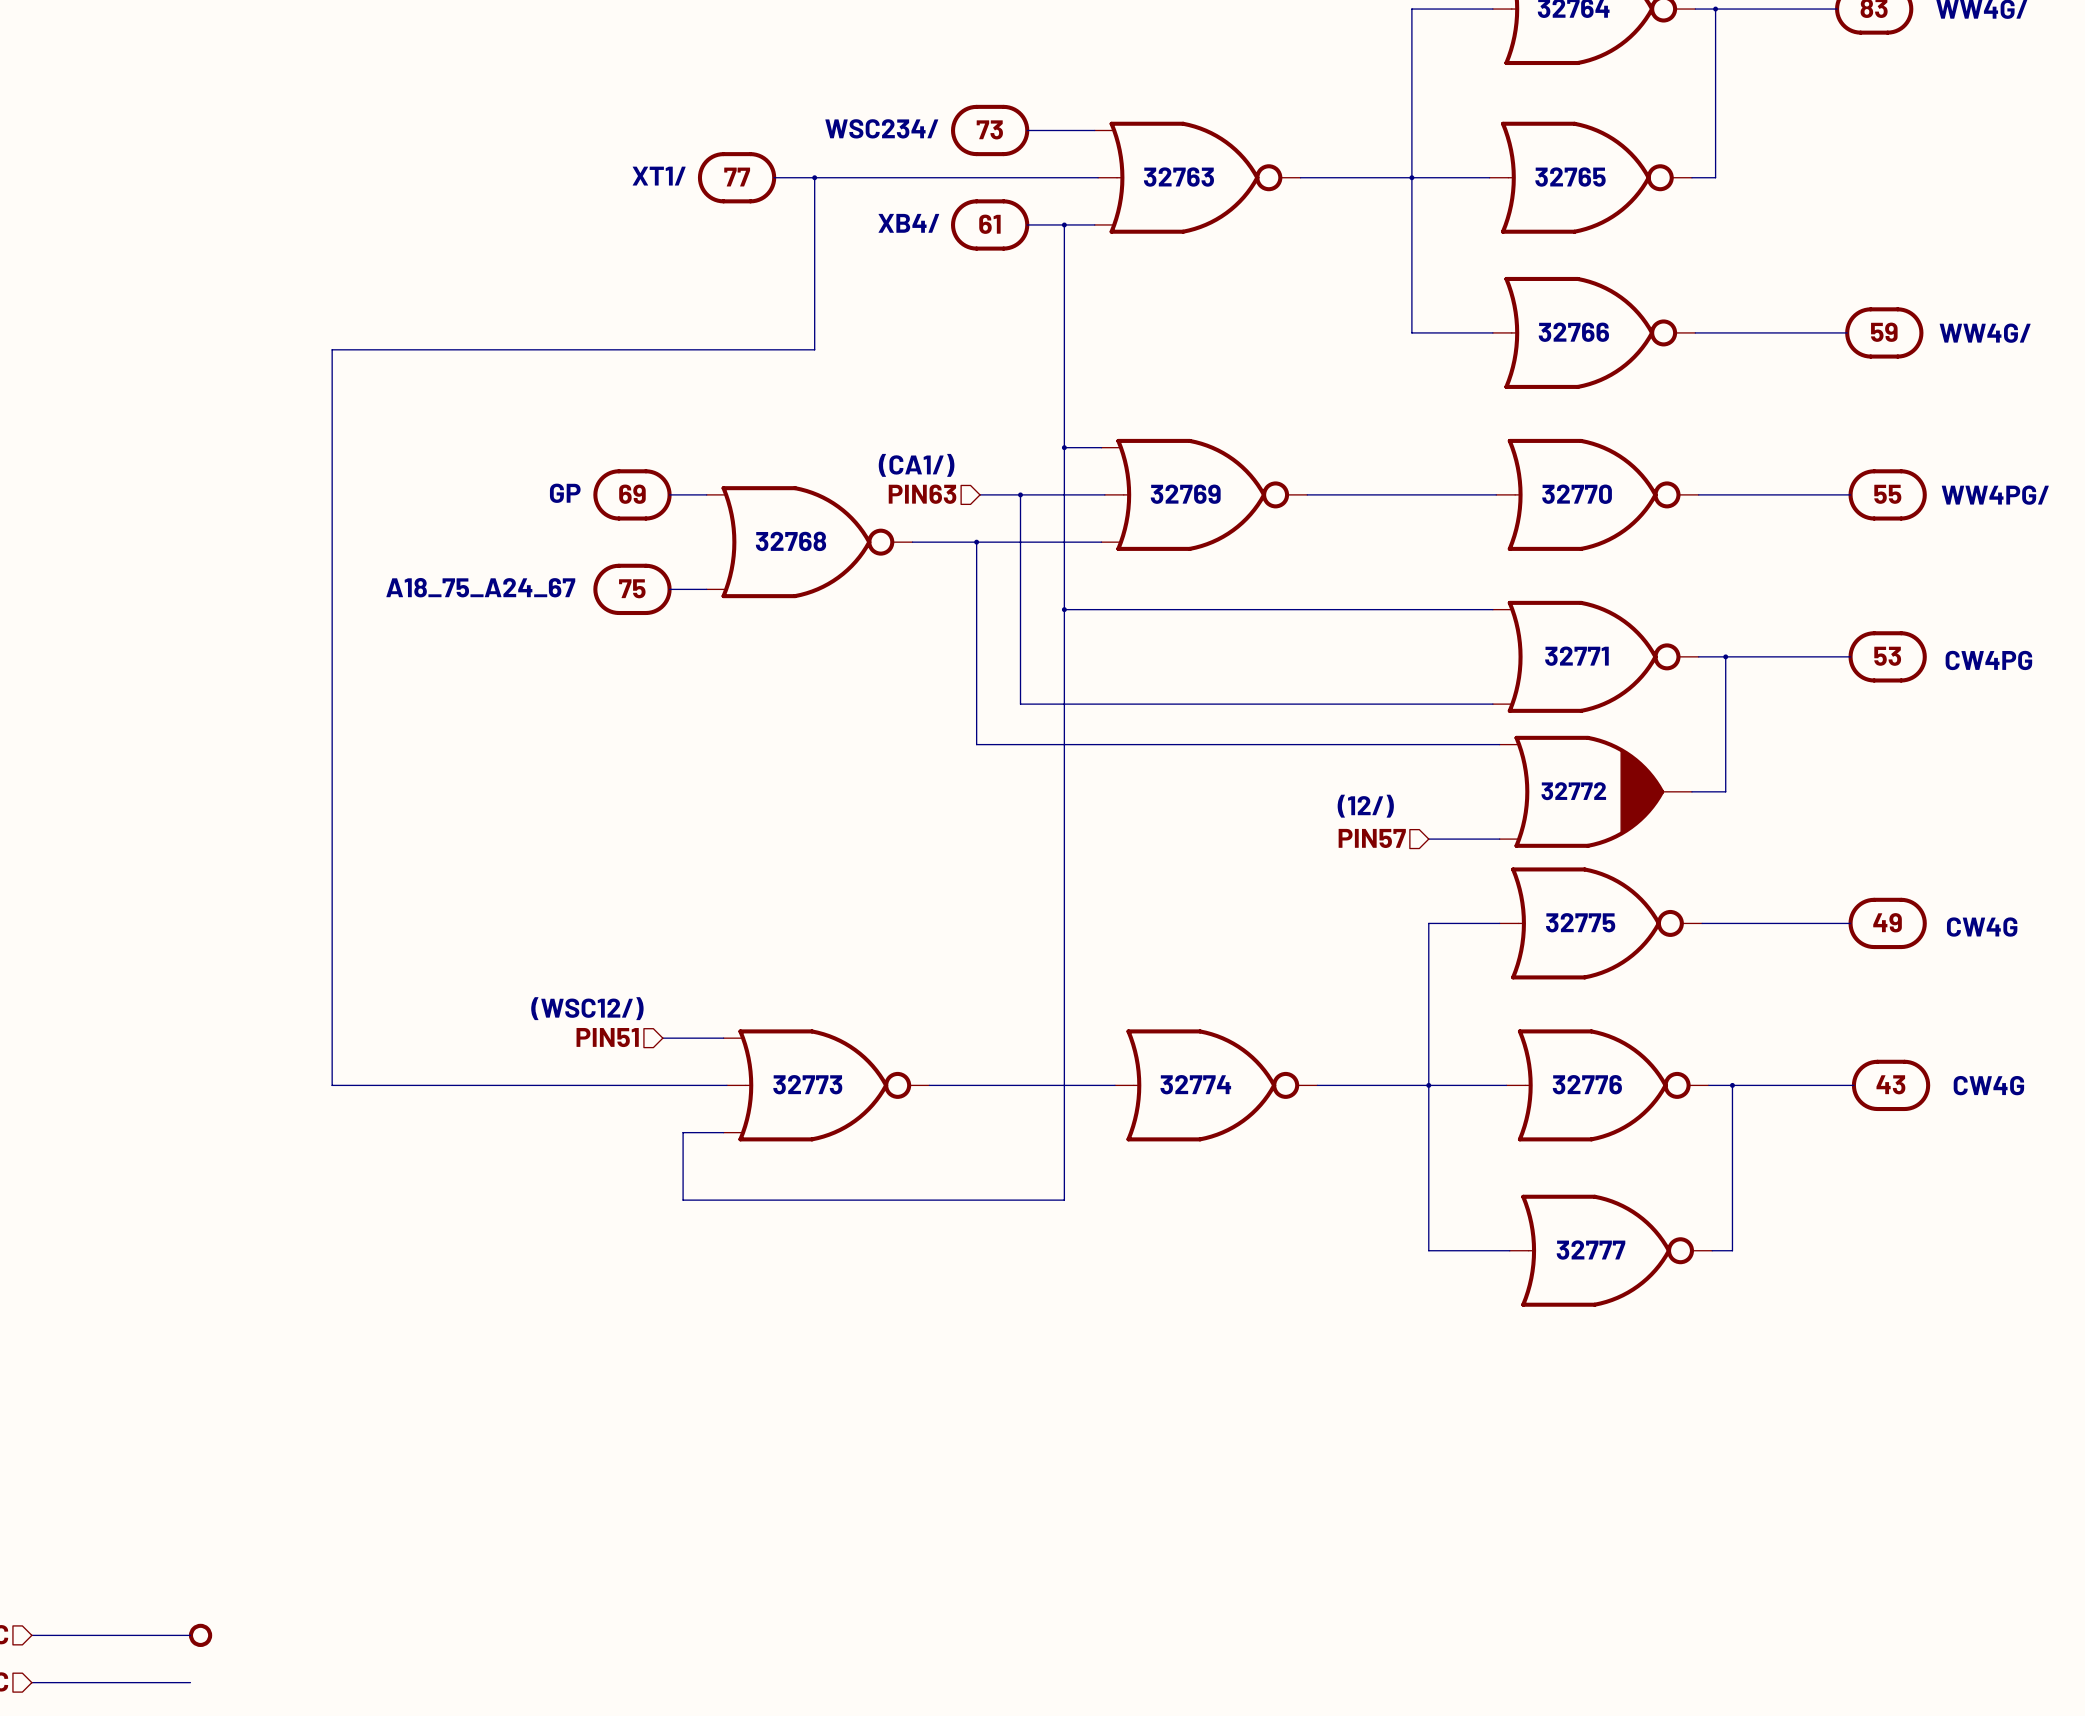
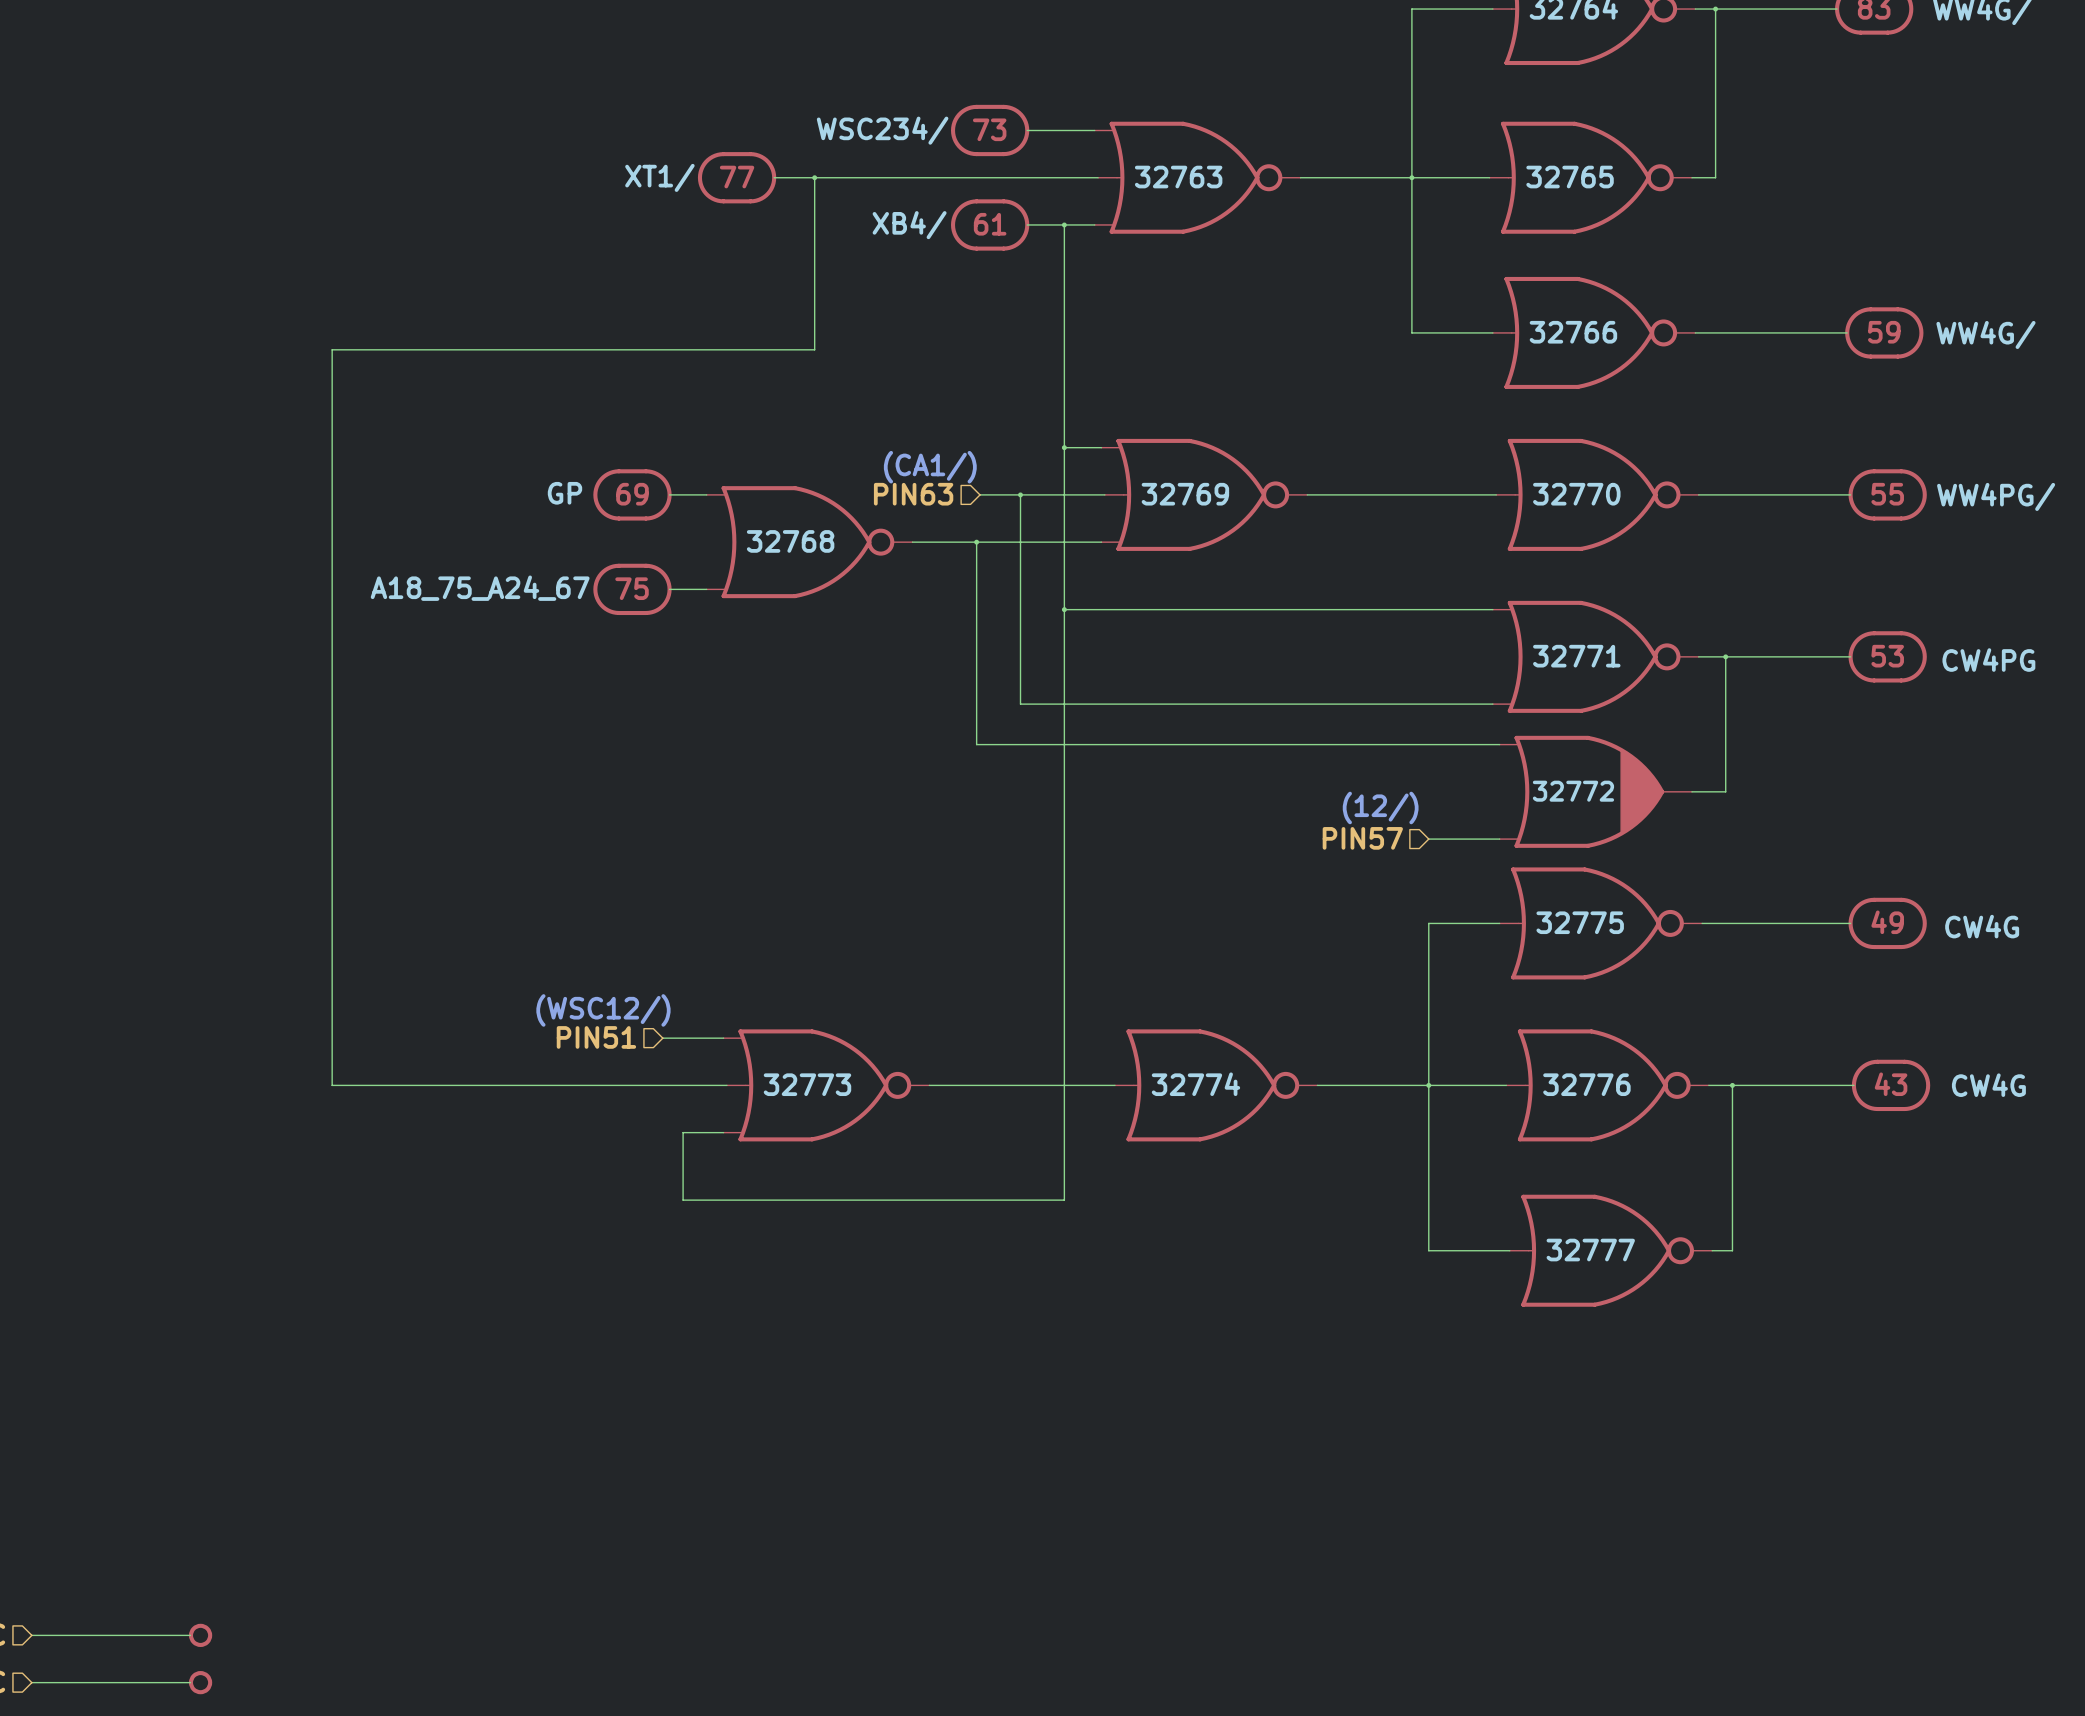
part: none -> (200, 1682)

